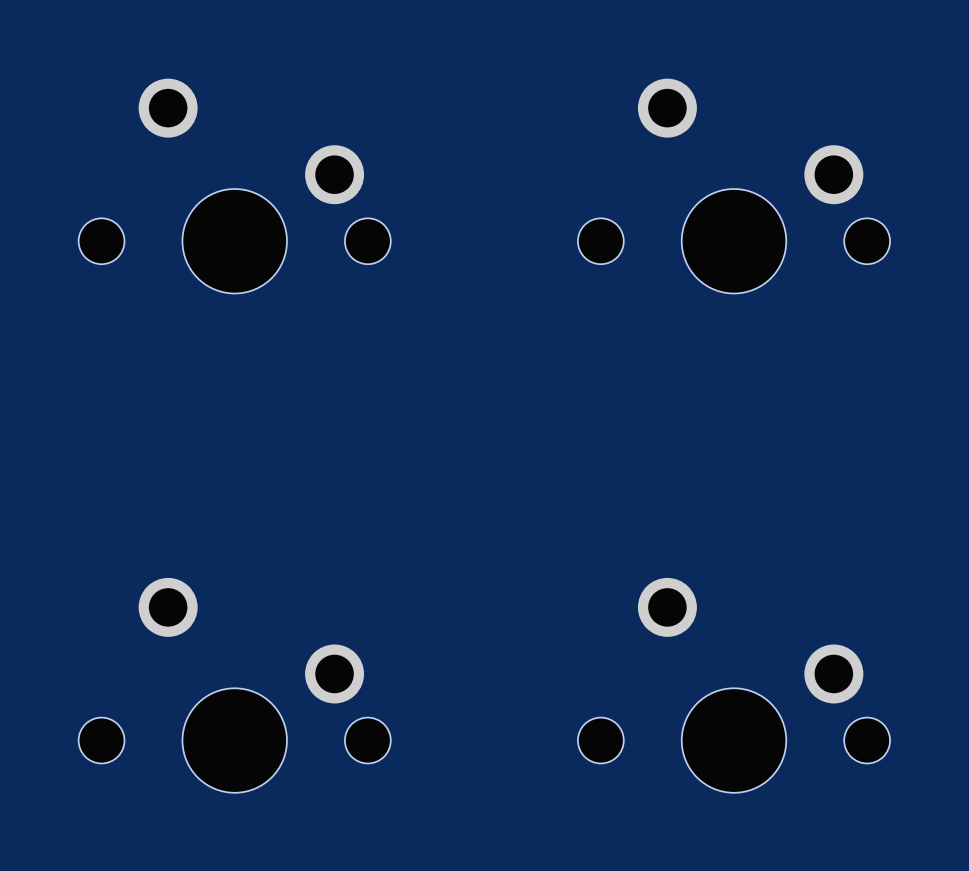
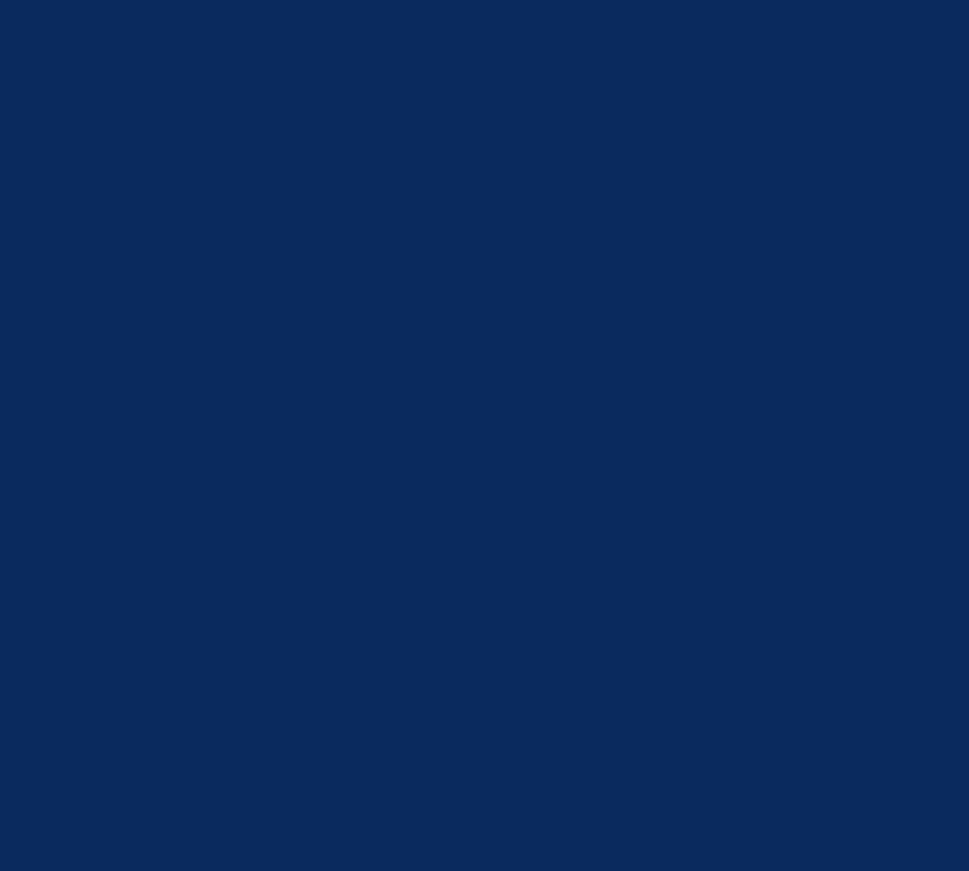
part: (234, 186) -> none
part: (733, 186) -> none
part: (234, 685) -> none
part: (733, 685) -> none

